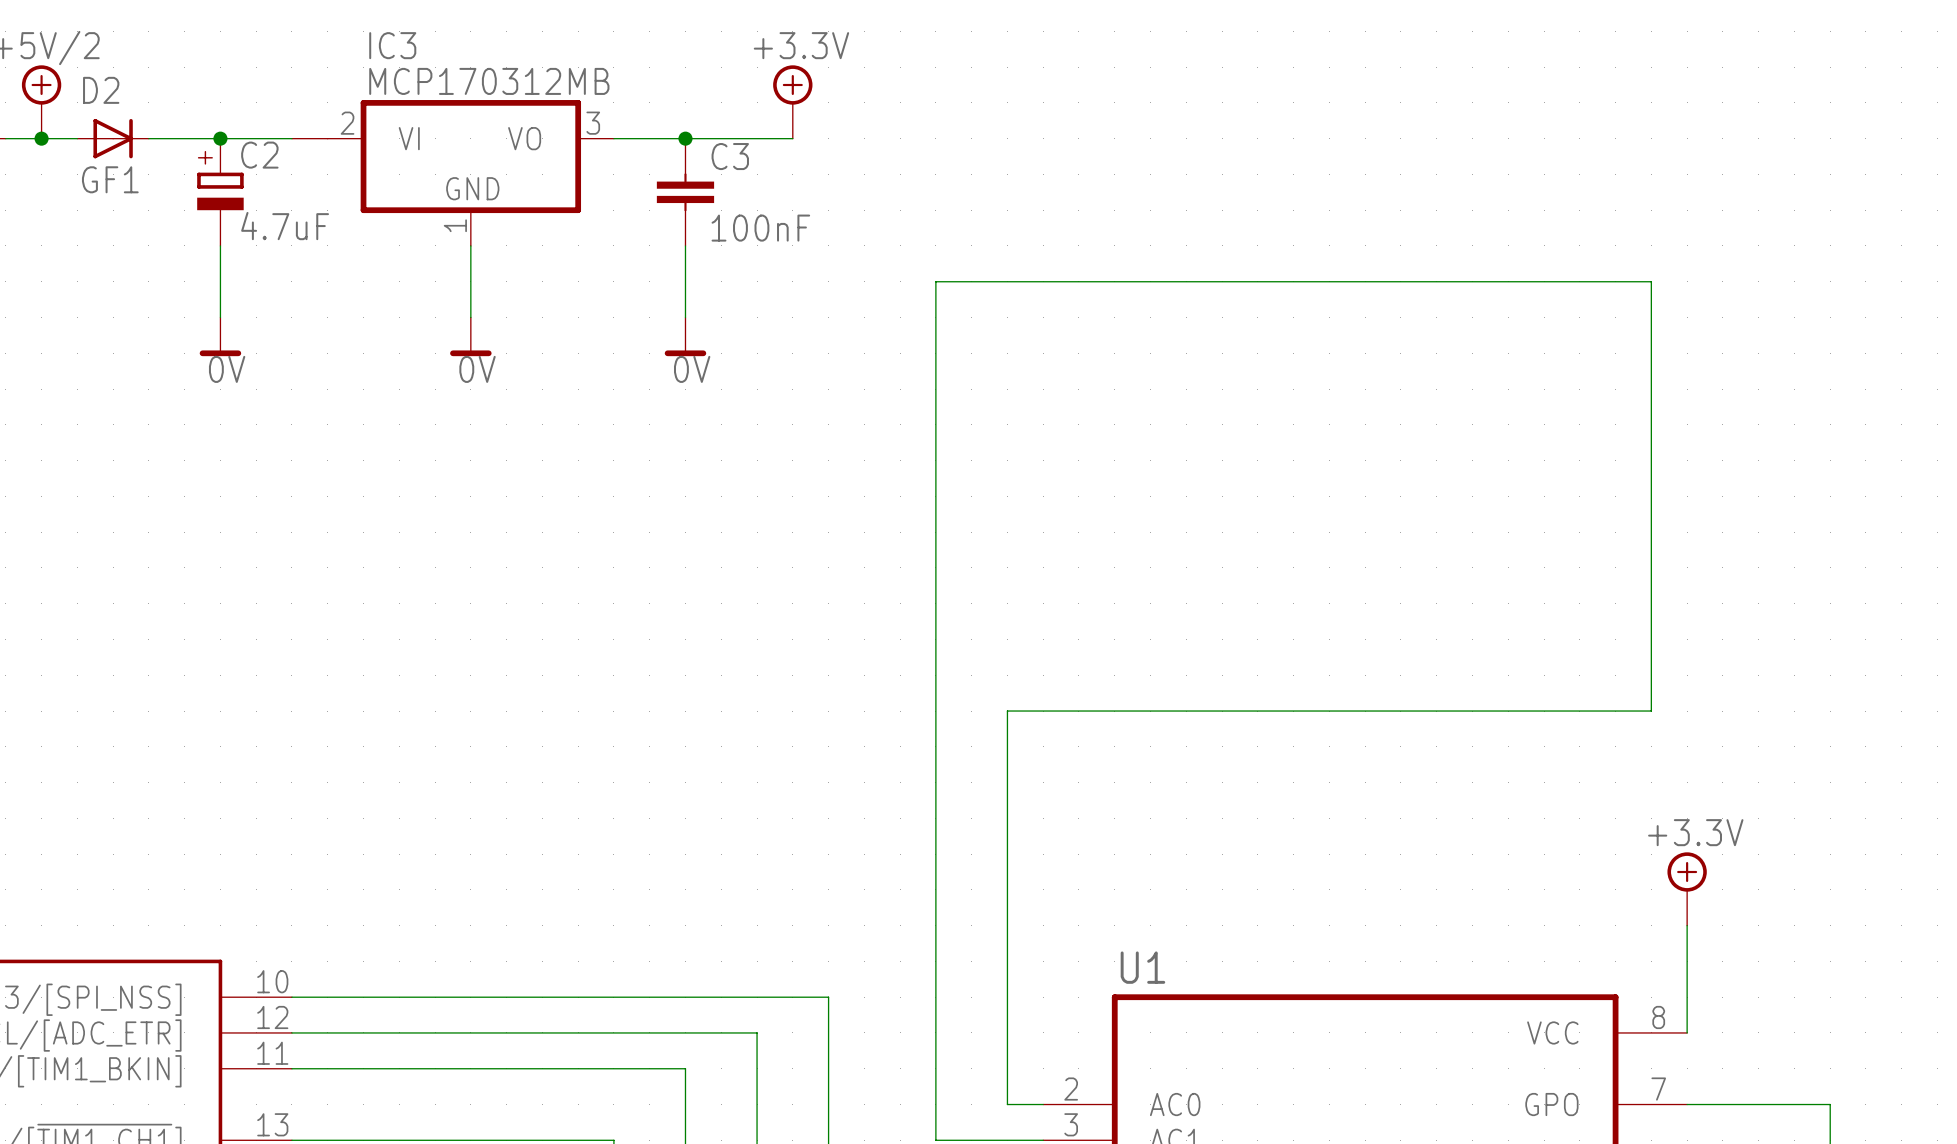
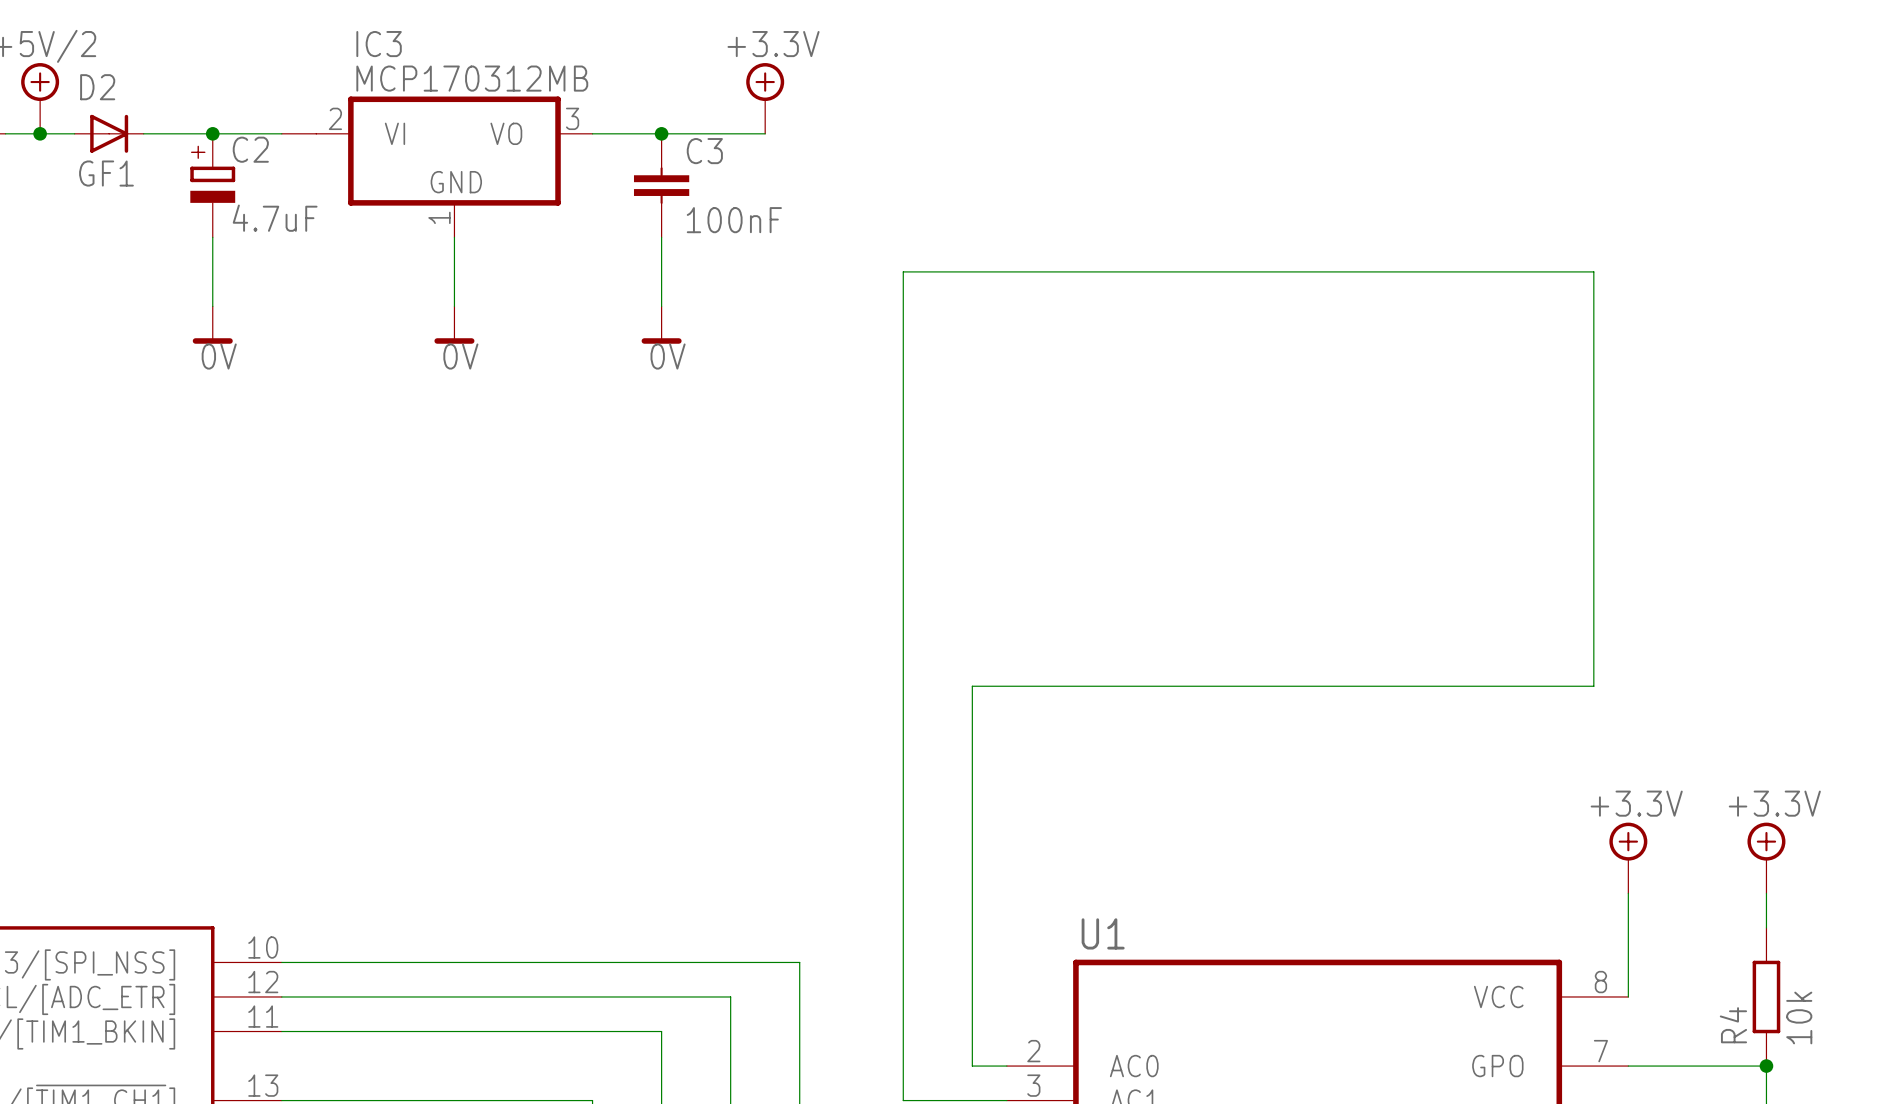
power symbol: none -> +3.3V (1766, 858)
wire: none -> (1766, 893) (1766, 927)
R4: none -> 10k (1766, 996)
junction: none -> (1766, 1066)

